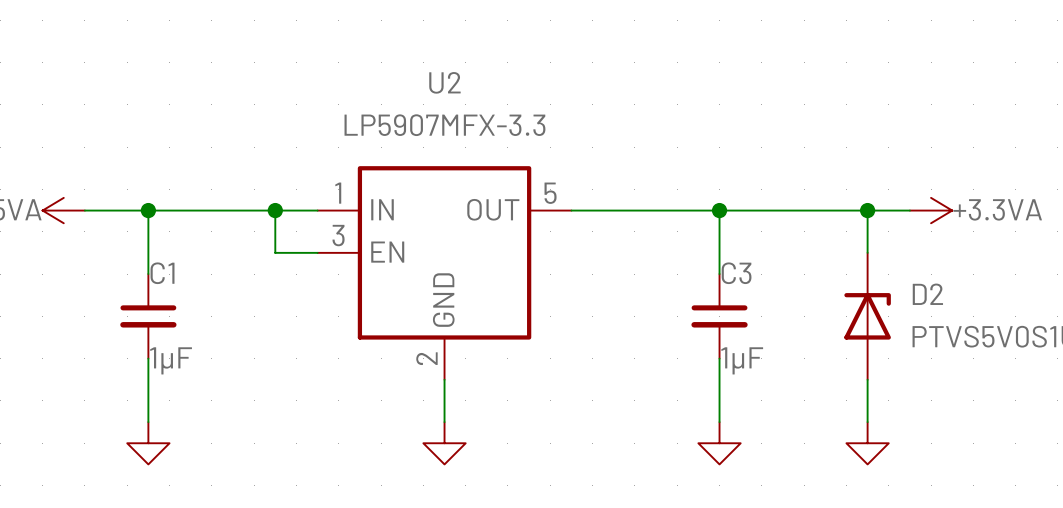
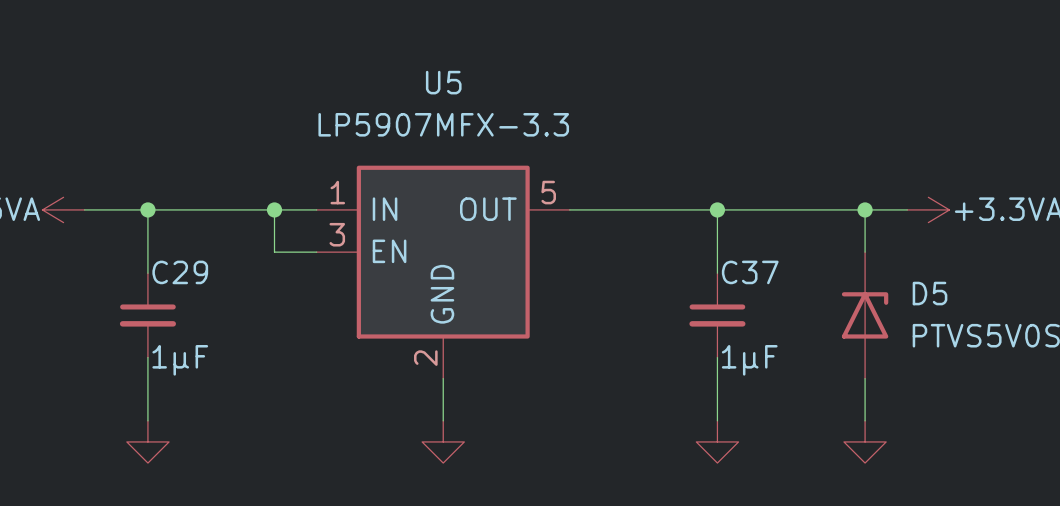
U2 name: U2 (444, 82) -> U5 (443, 82)
C1 name: C1 (162, 273) -> C29 (180, 272)
C3 name: C3 (736, 273) -> C37 (750, 272)
D2 name: D2 (927, 294) -> D5 (930, 293)

